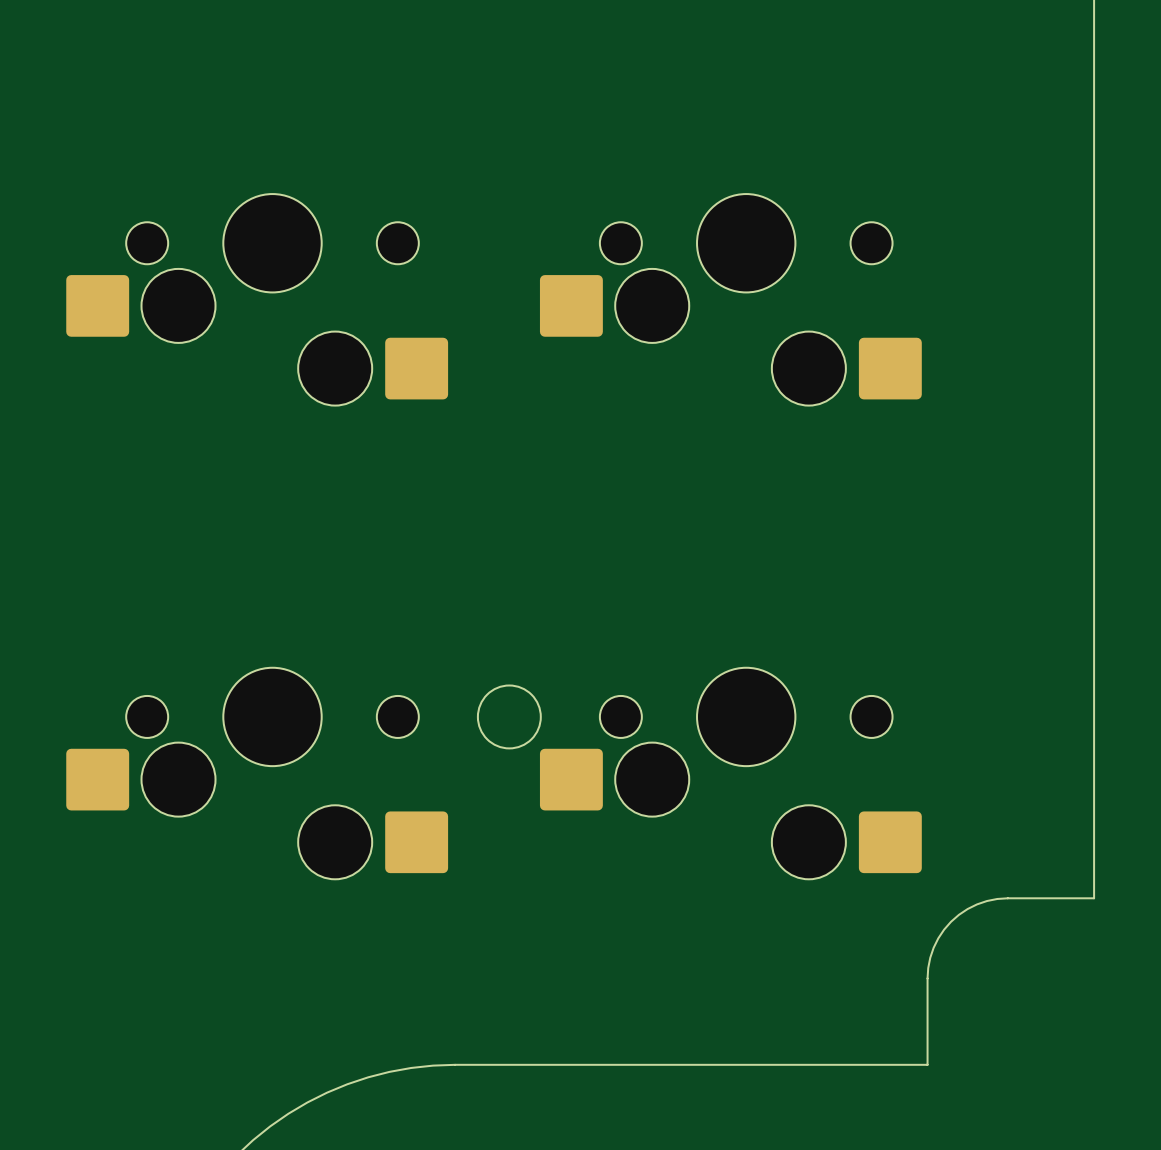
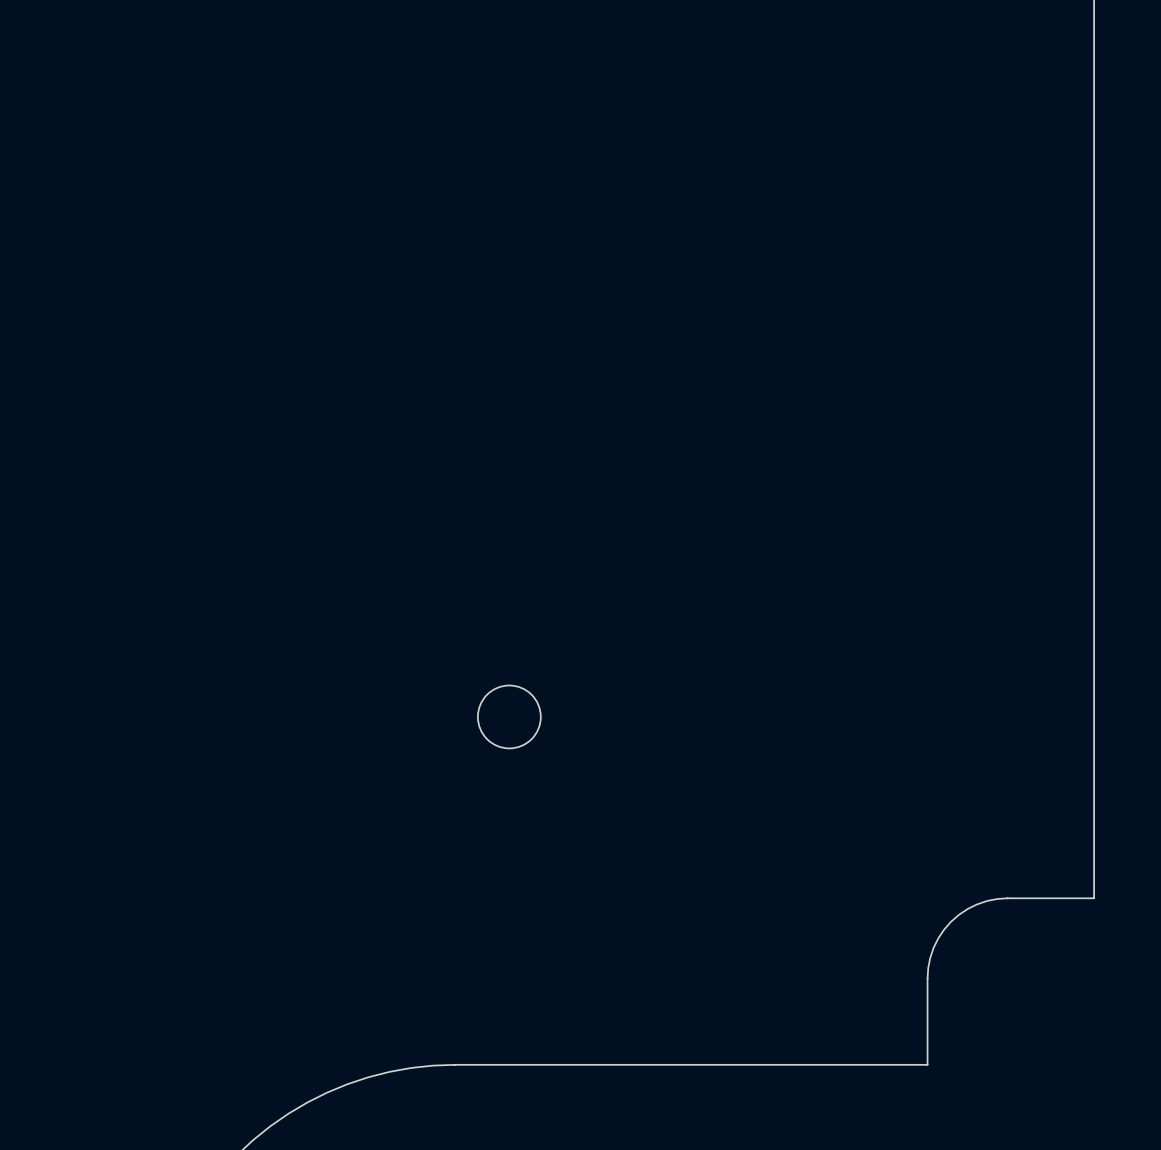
part: (257, 299) -> none
part: (730, 299) -> none
part: (257, 773) -> none
part: (730, 773) -> none

